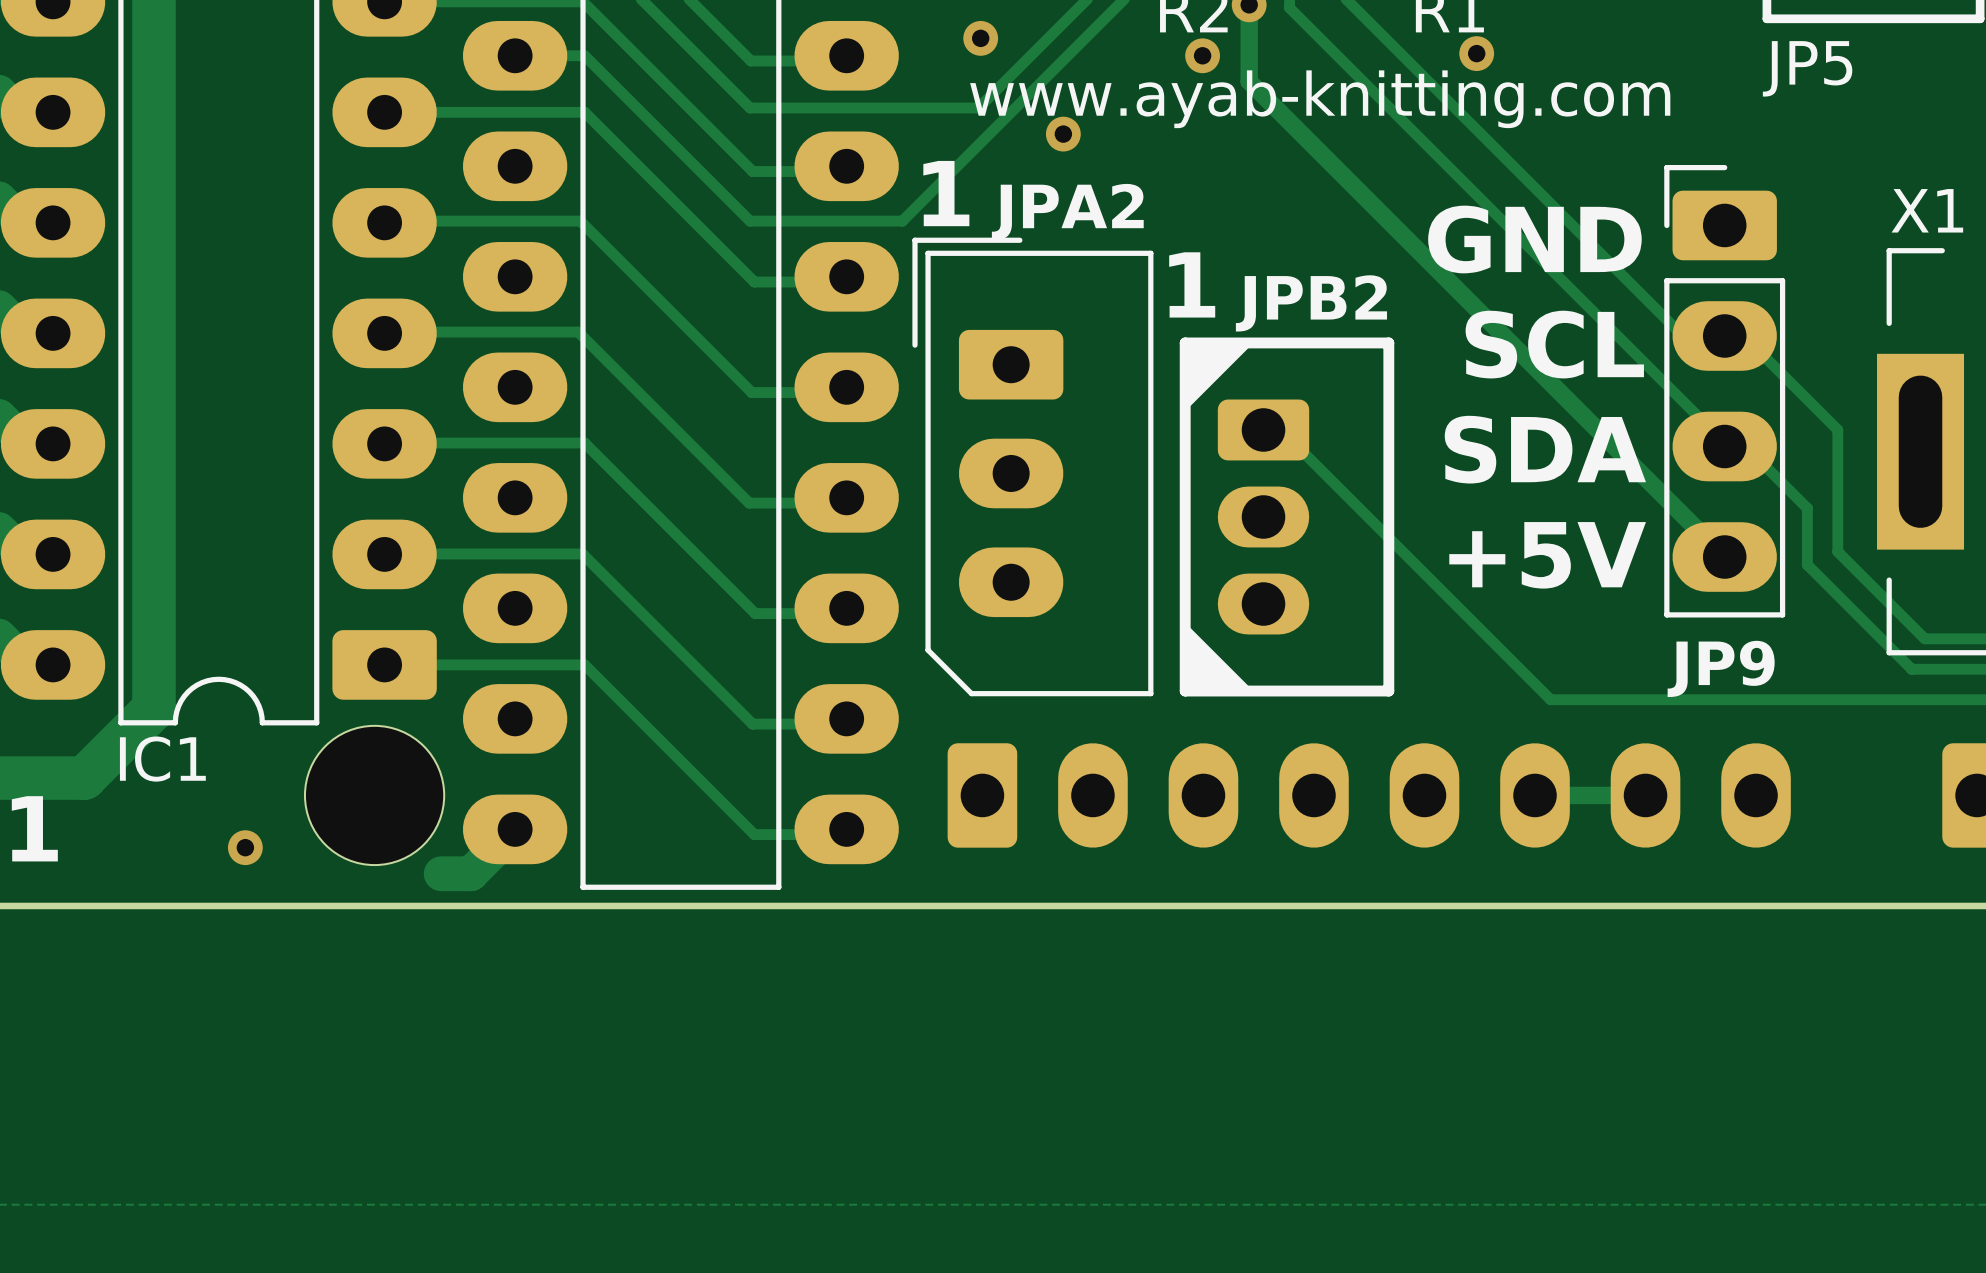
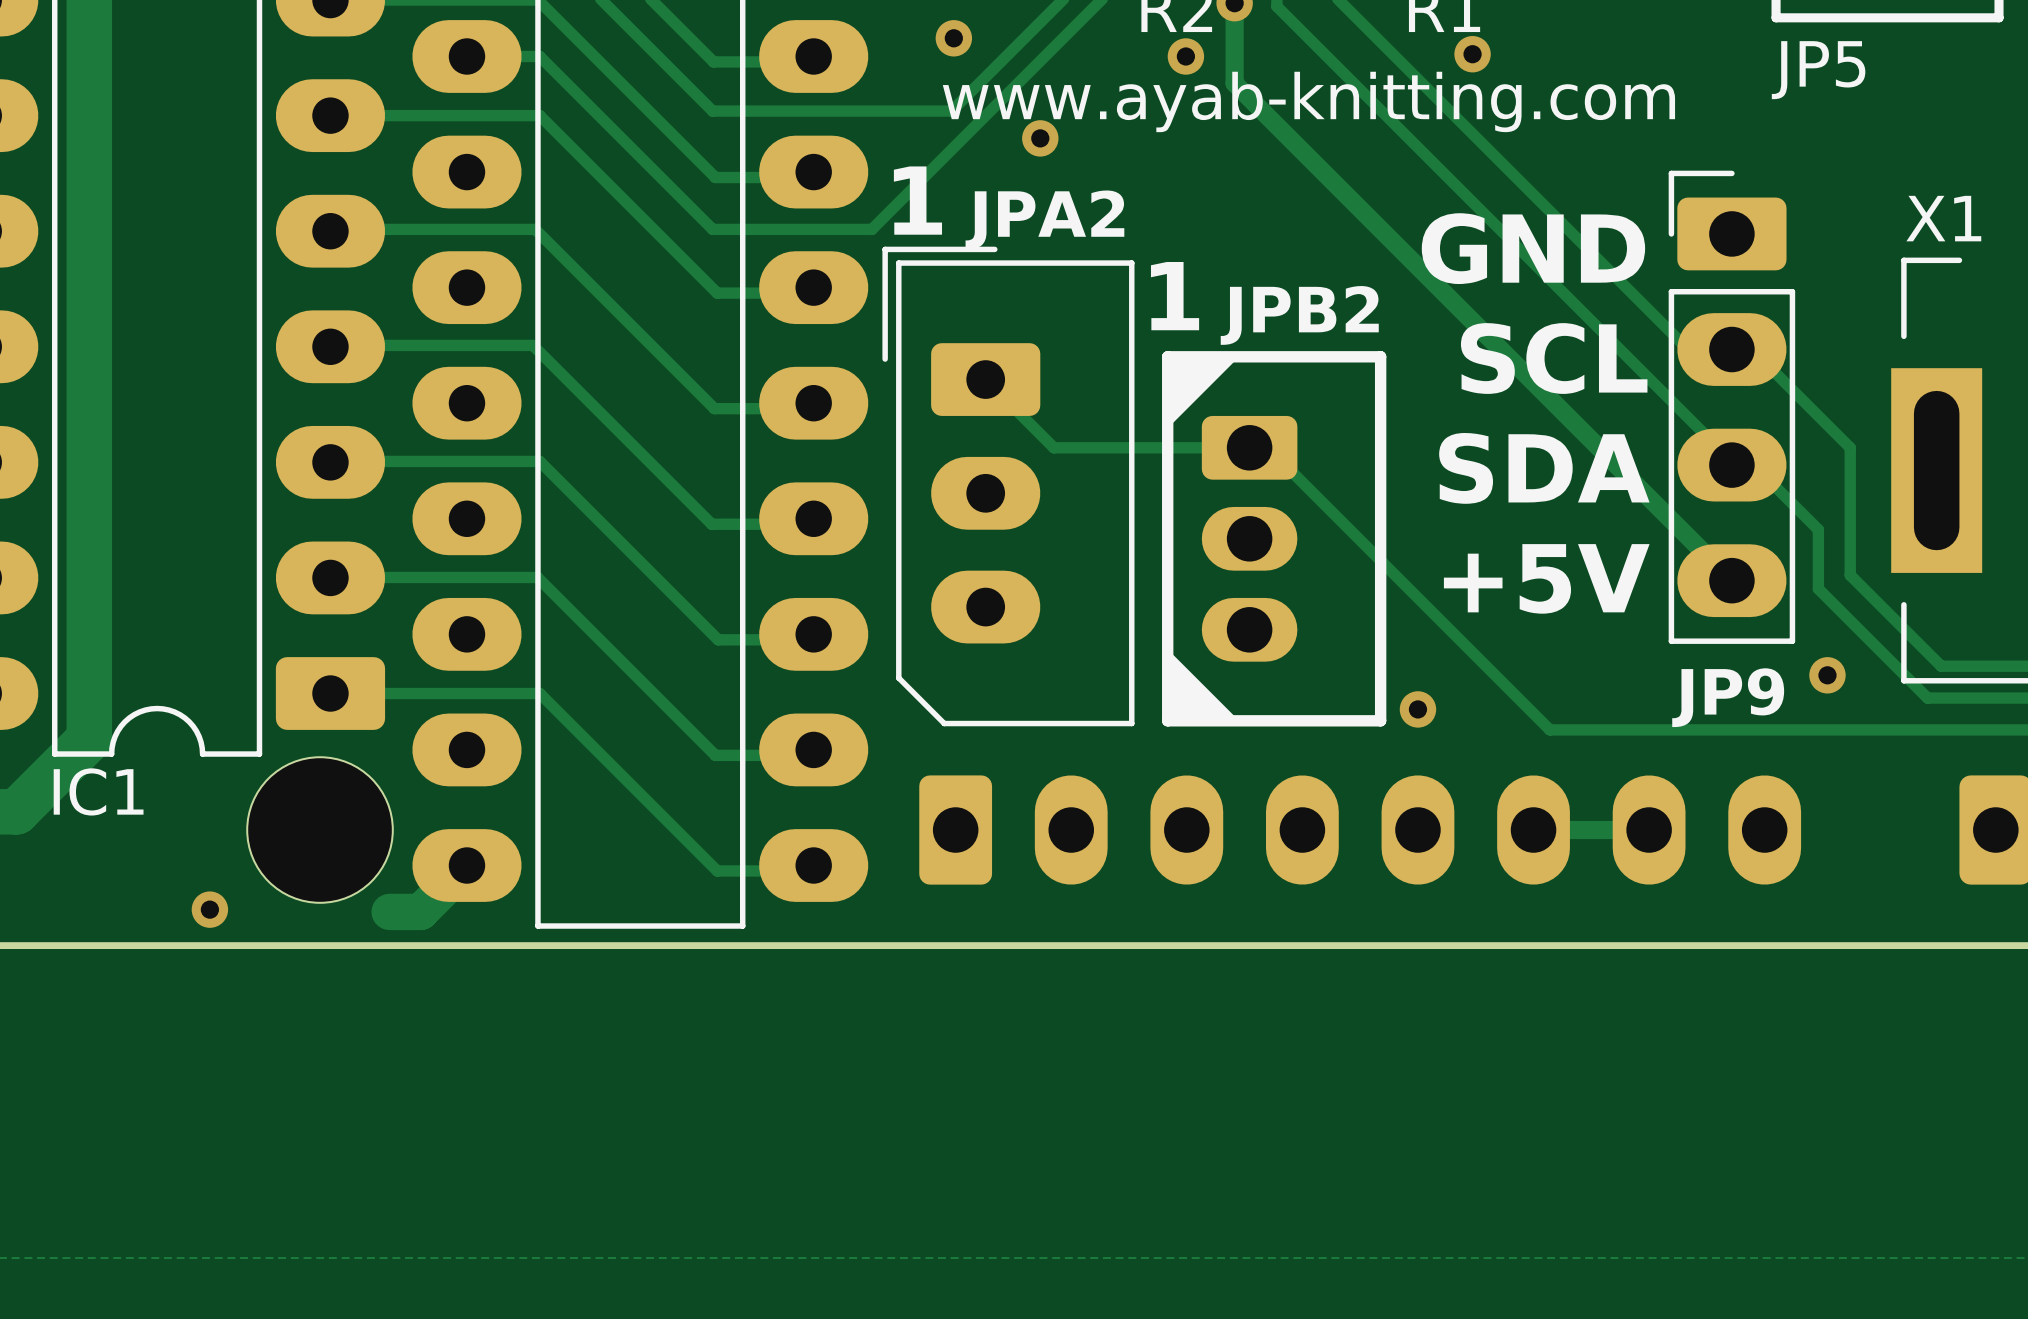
track: none -> (985, 379) (1053, 447) (1235, 447)
via: none -> (1827, 675)
via: none -> (1417, 709)
via position: (245, 847) -> (209, 909)

